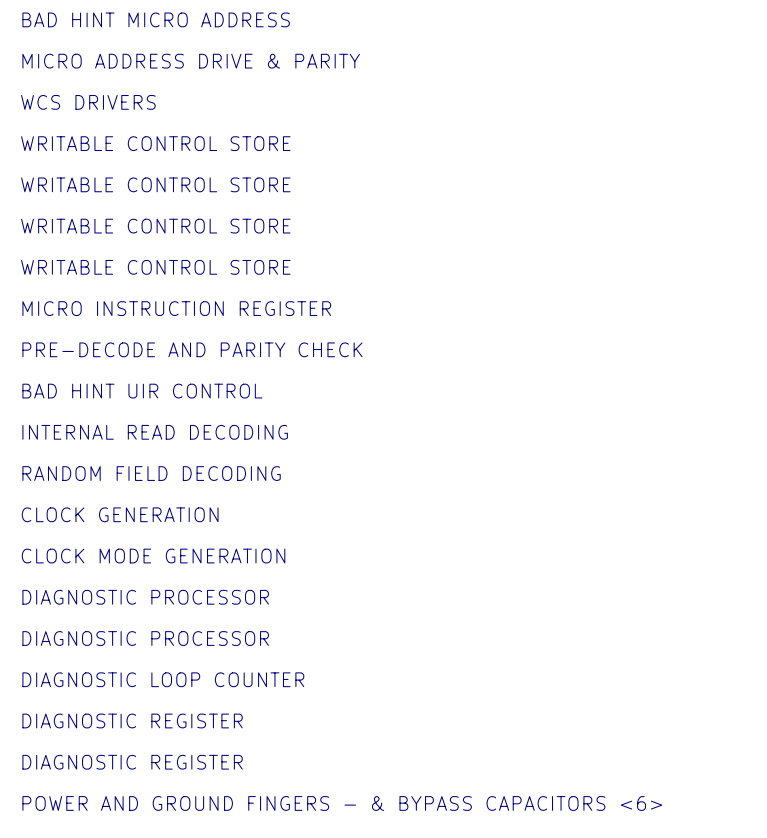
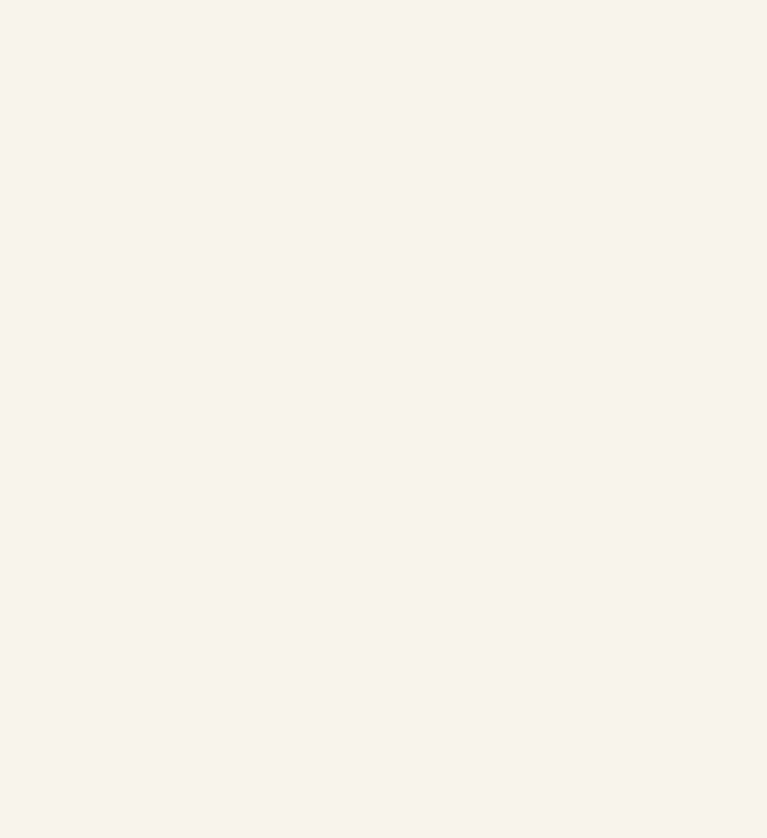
text: BAD HINT MICRO ADDRESS (156, 19) -> none
text: MICRO ADDRESS DRIVE & PARITY (191, 61) -> none
text: WCS DRIVERS (88, 102) -> none
text: WRITABLE CONTROL STORE (155, 143) -> none
text: WRITABLE CONTROL STORE (155, 184) -> none
text: WRITABLE CONTROL STORE (155, 226) -> none
text: WRITABLE CONTROL STORE (155, 267) -> none
text: MICRO INSTRUCTION REGISTER (176, 308) -> none
text: PRE-DECODE AND PARITY CHECK (192, 349) -> none
text: BAD HINT UIR CONTROL (142, 391) -> none
text: INTERNAL READ DECODING (155, 432) -> none
text: RANDOM FIELD DECODING (151, 473) -> none
text: CLOCK GENERATION (120, 514) -> none
text: CLOCK MODE GENERATION (153, 556) -> none
text: DIAGNOSTIC PROCESSOR (145, 597) -> none
text: DIAGNOSTIC PROCESSOR (145, 638) -> none
text: DIAGNOSTIC LOOP COUNTER (163, 679) -> none
text: DIAGNOSTIC REGISTER (132, 720) -> none
text: DIAGNOSTIC REGISTER (132, 762) -> none
text: POWER AND GROUND FINGERS - & BYPASS CAPACITORS <6> (342, 803) -> none

